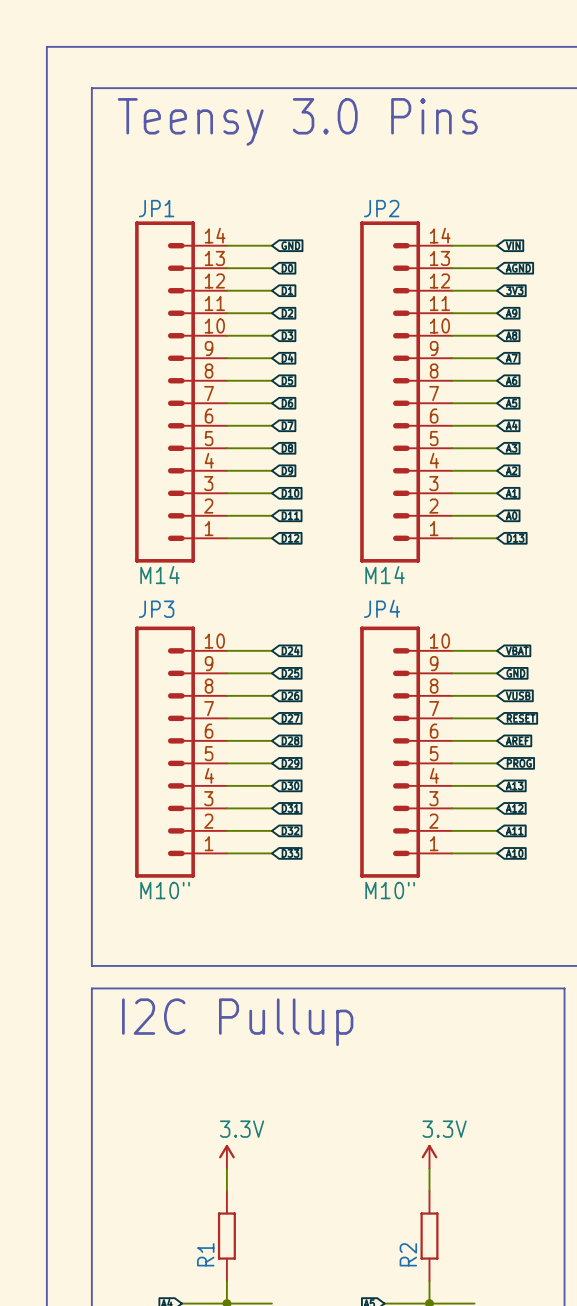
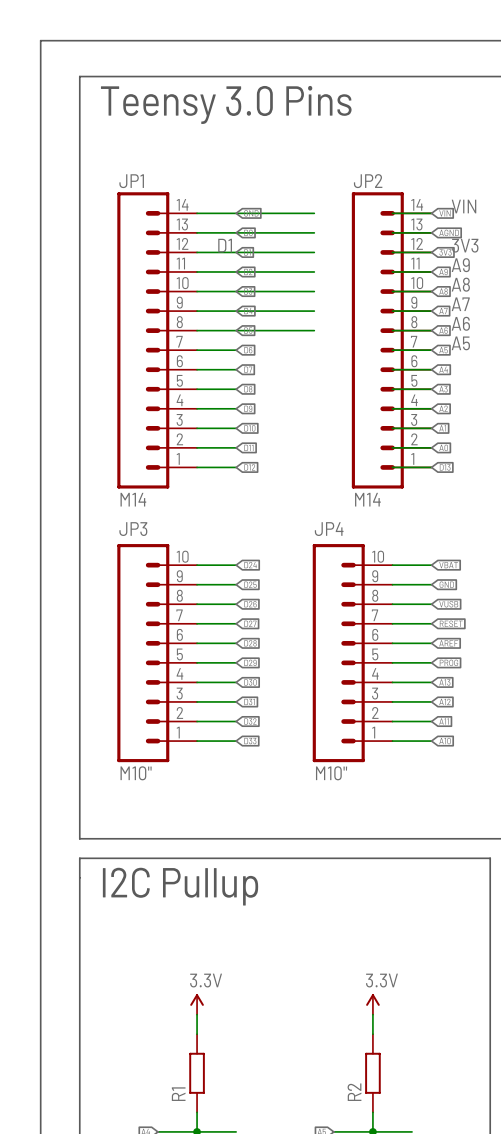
label: none -> VIN (464, 206)
wire: none -> (236, 213) (314, 213)
wire: none -> (236, 232) (314, 232)
label: none -> D1 (225, 245)
label: none -> 3V3 (465, 245)
wire: none -> (236, 252) (314, 252)
label: none -> A9 (460, 265)
wire: none -> (236, 271) (314, 271)
label: none -> A8 (460, 284)
wire: none -> (236, 291) (314, 291)
label: none -> A7 (460, 304)
wire: none -> (236, 311) (314, 311)
label: none -> A6 (460, 323)
wire: none -> (236, 330) (314, 330)
JP2 position: (406, 392) -> (391, 340)
label: none -> A5 (460, 343)

